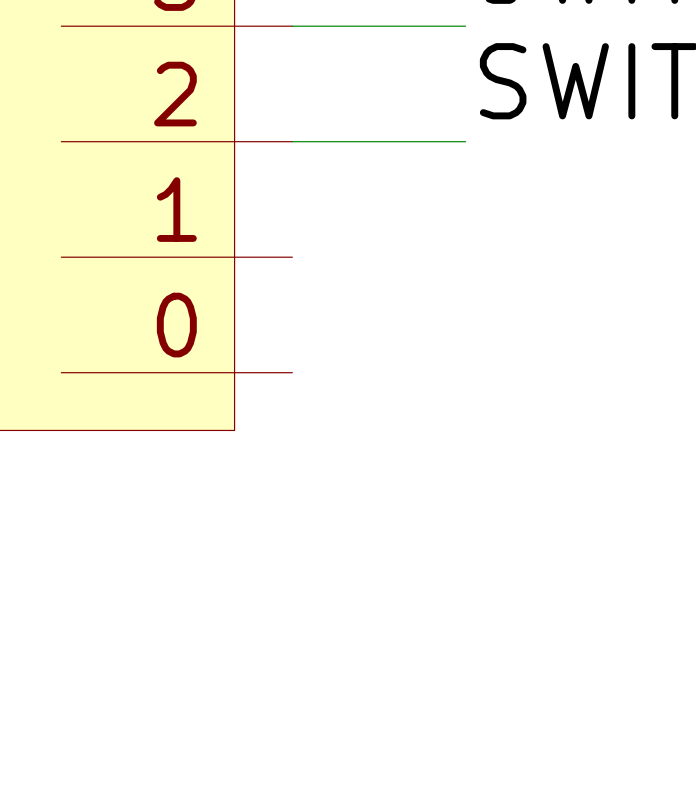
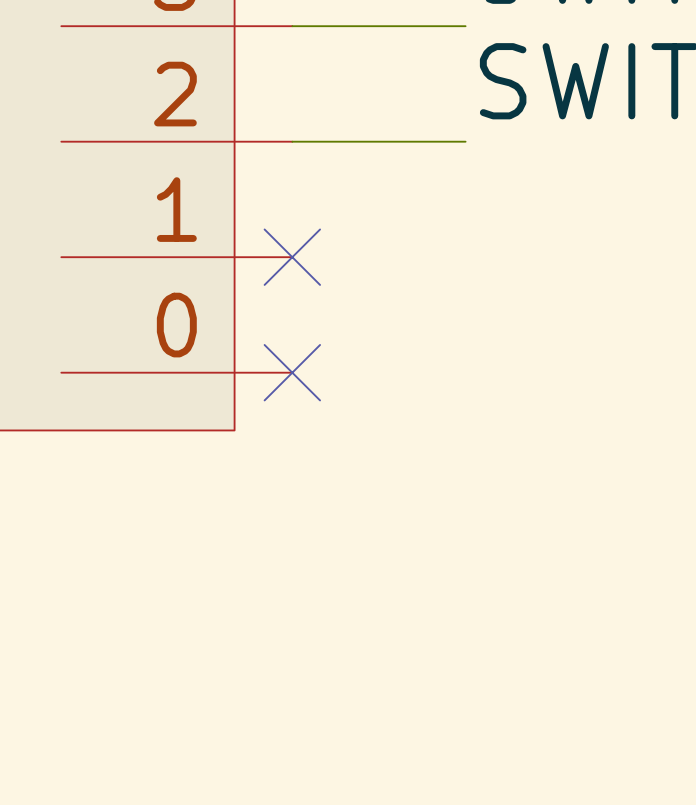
no-connect mark: none -> (292, 257)
no-connect mark: none -> (292, 372)

